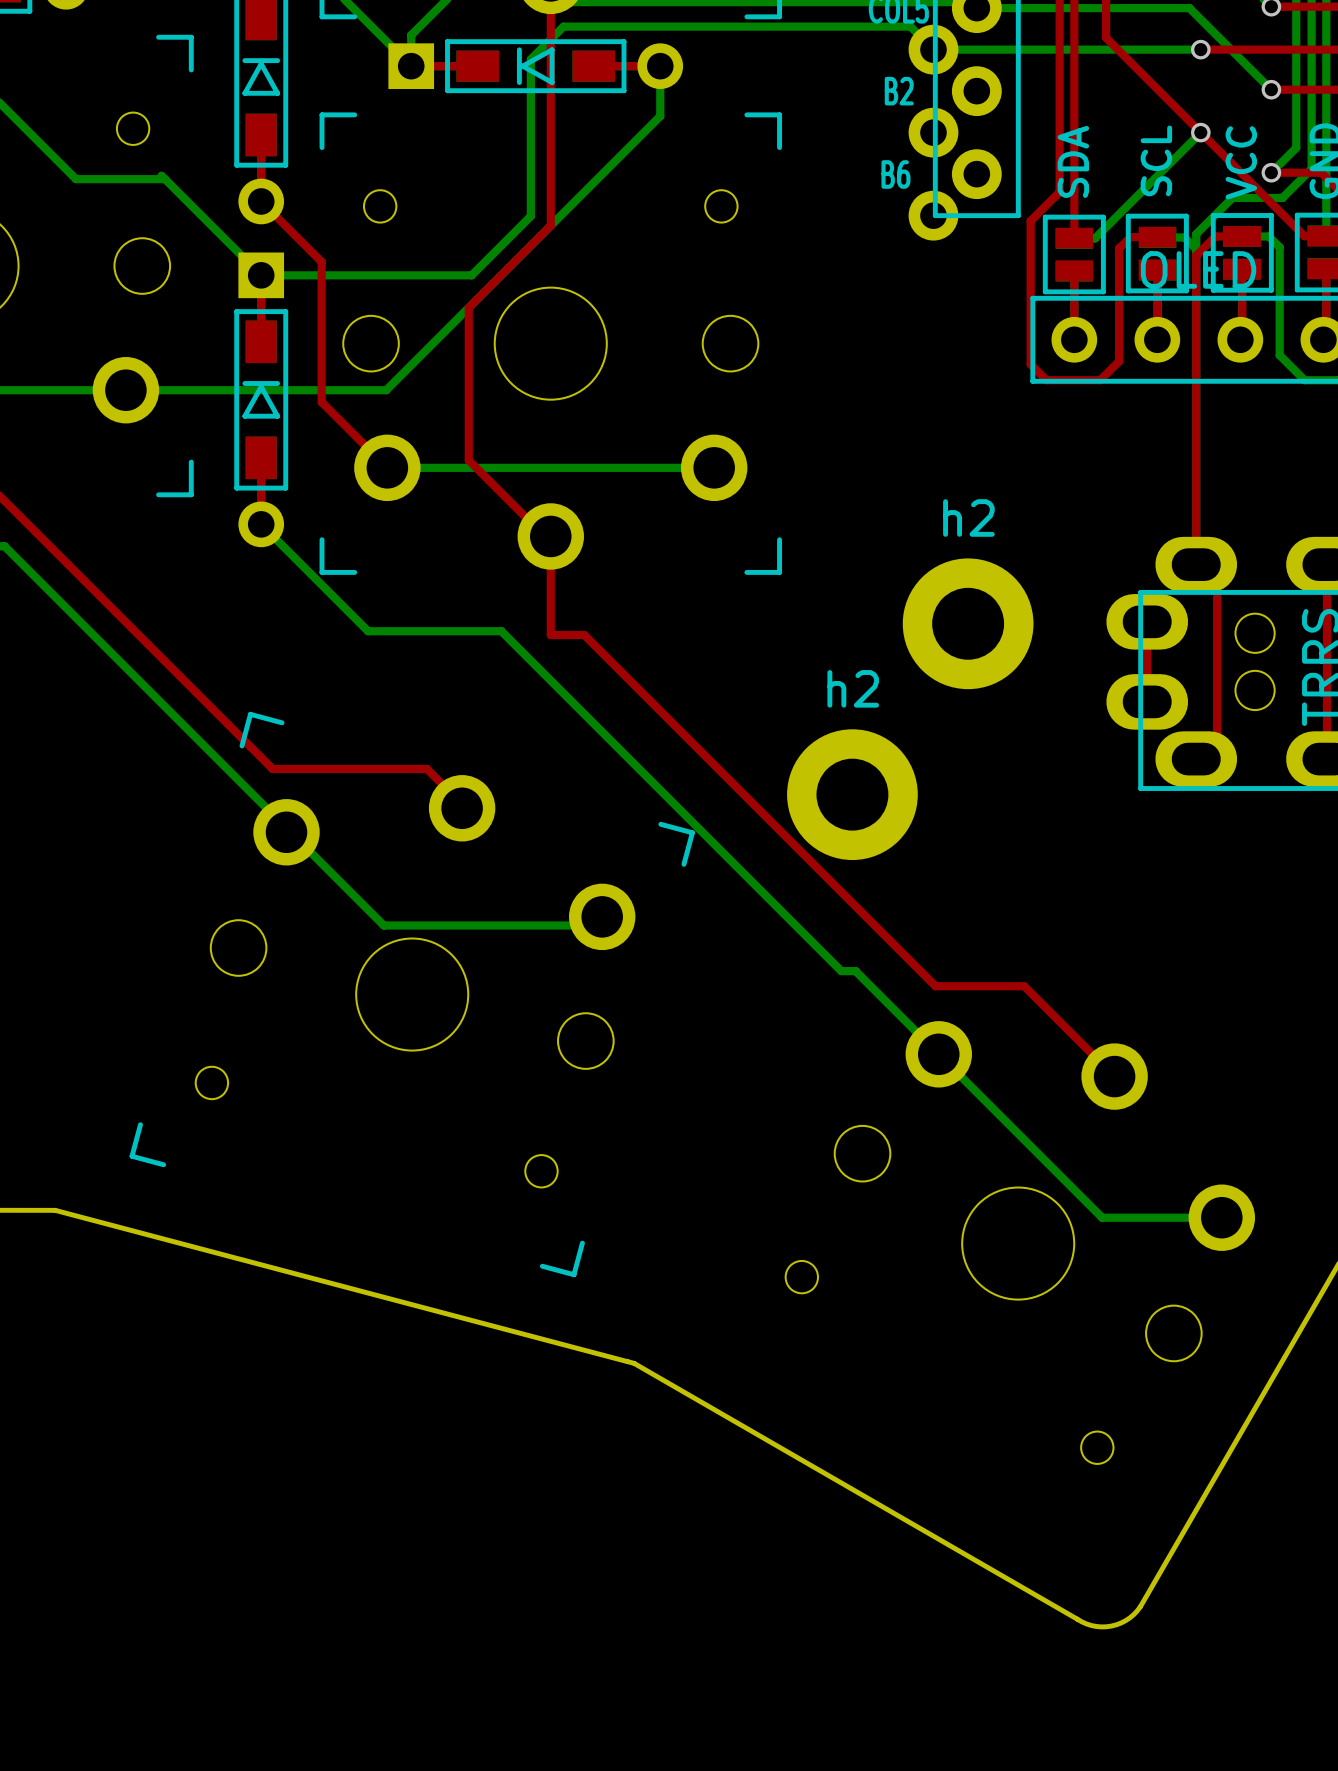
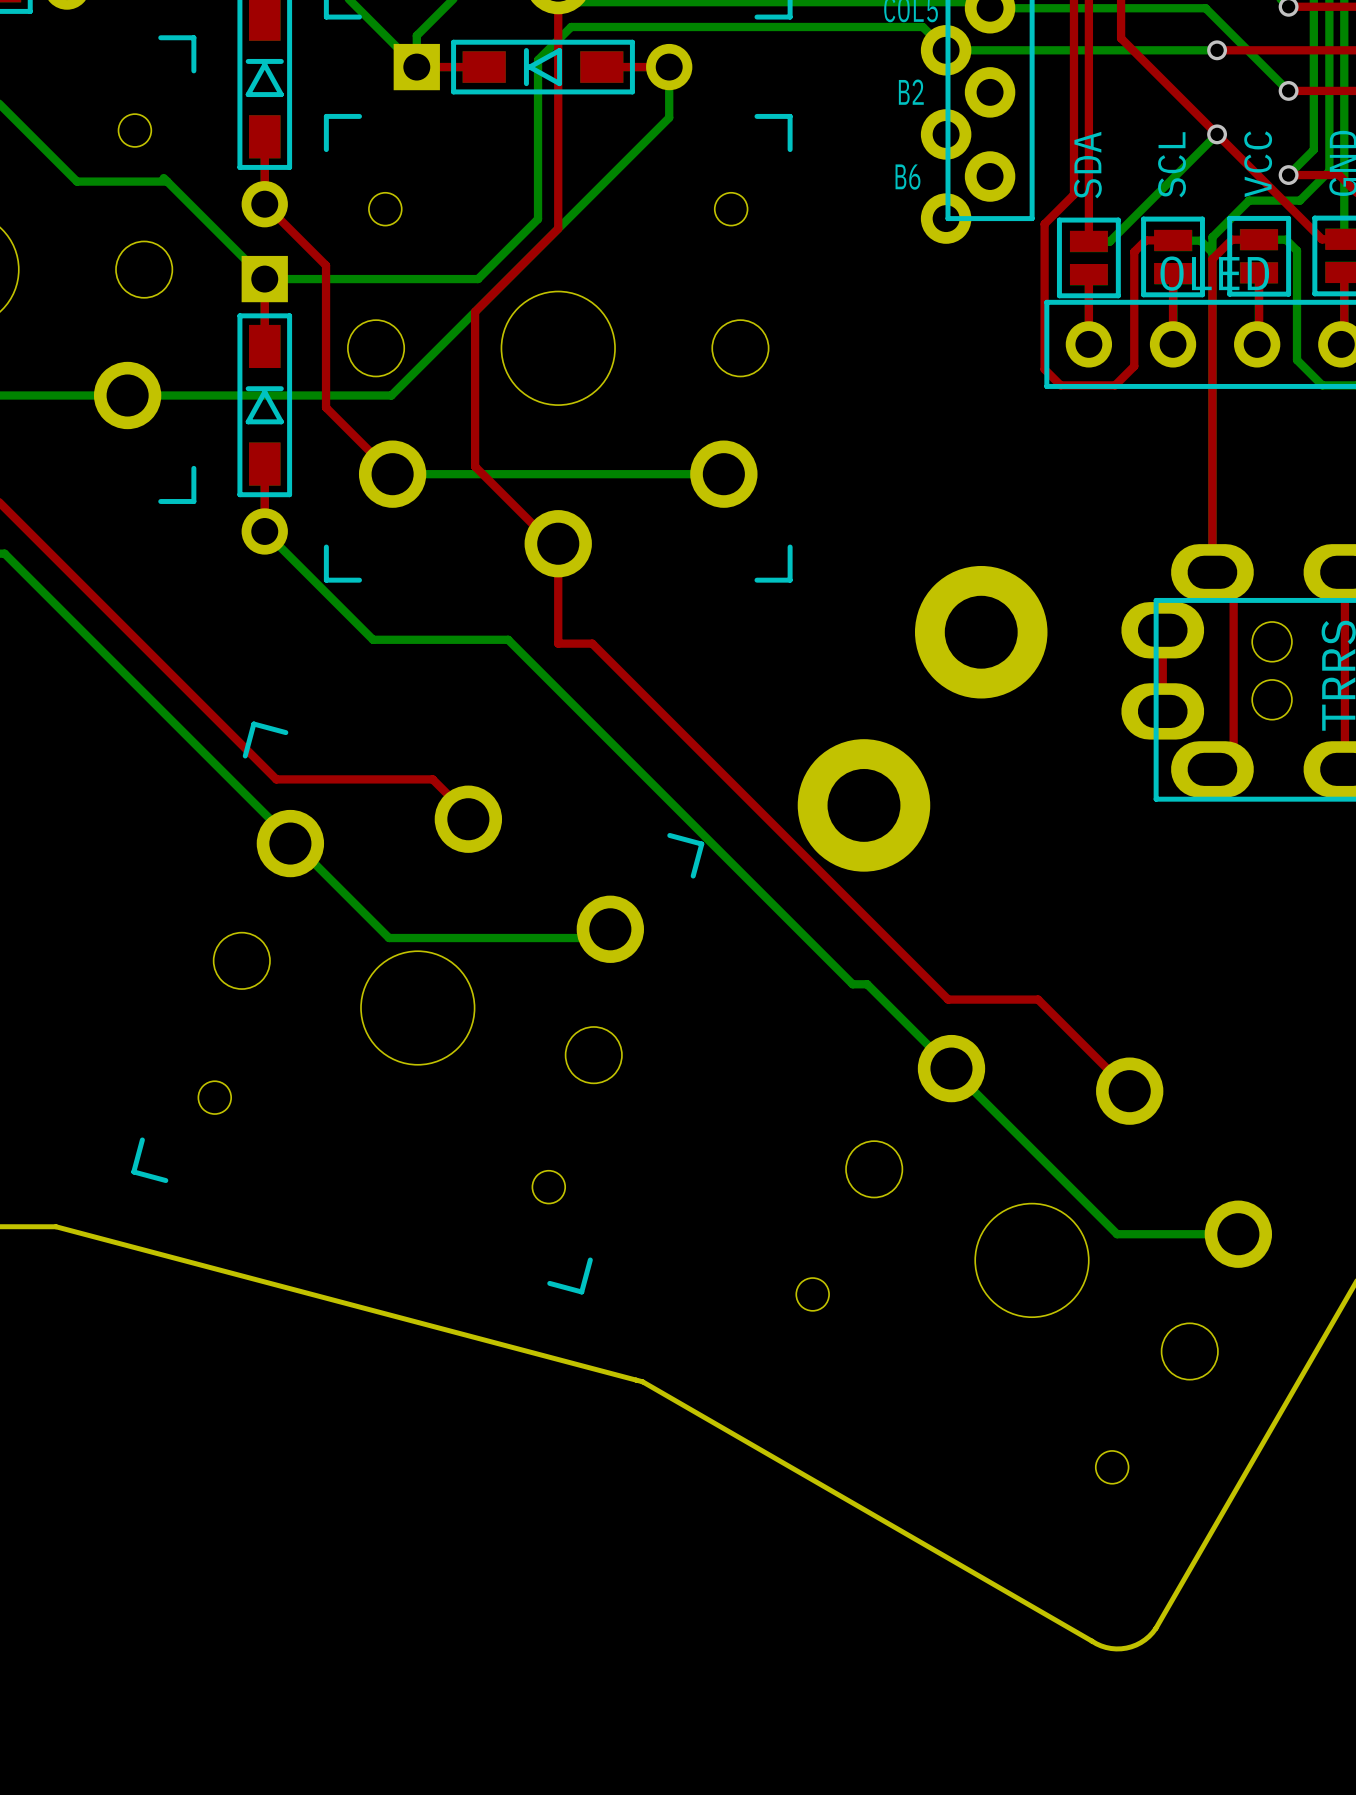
h2 name: h2 (968, 517) -> none
h2 name: h2 (853, 688) -> none

